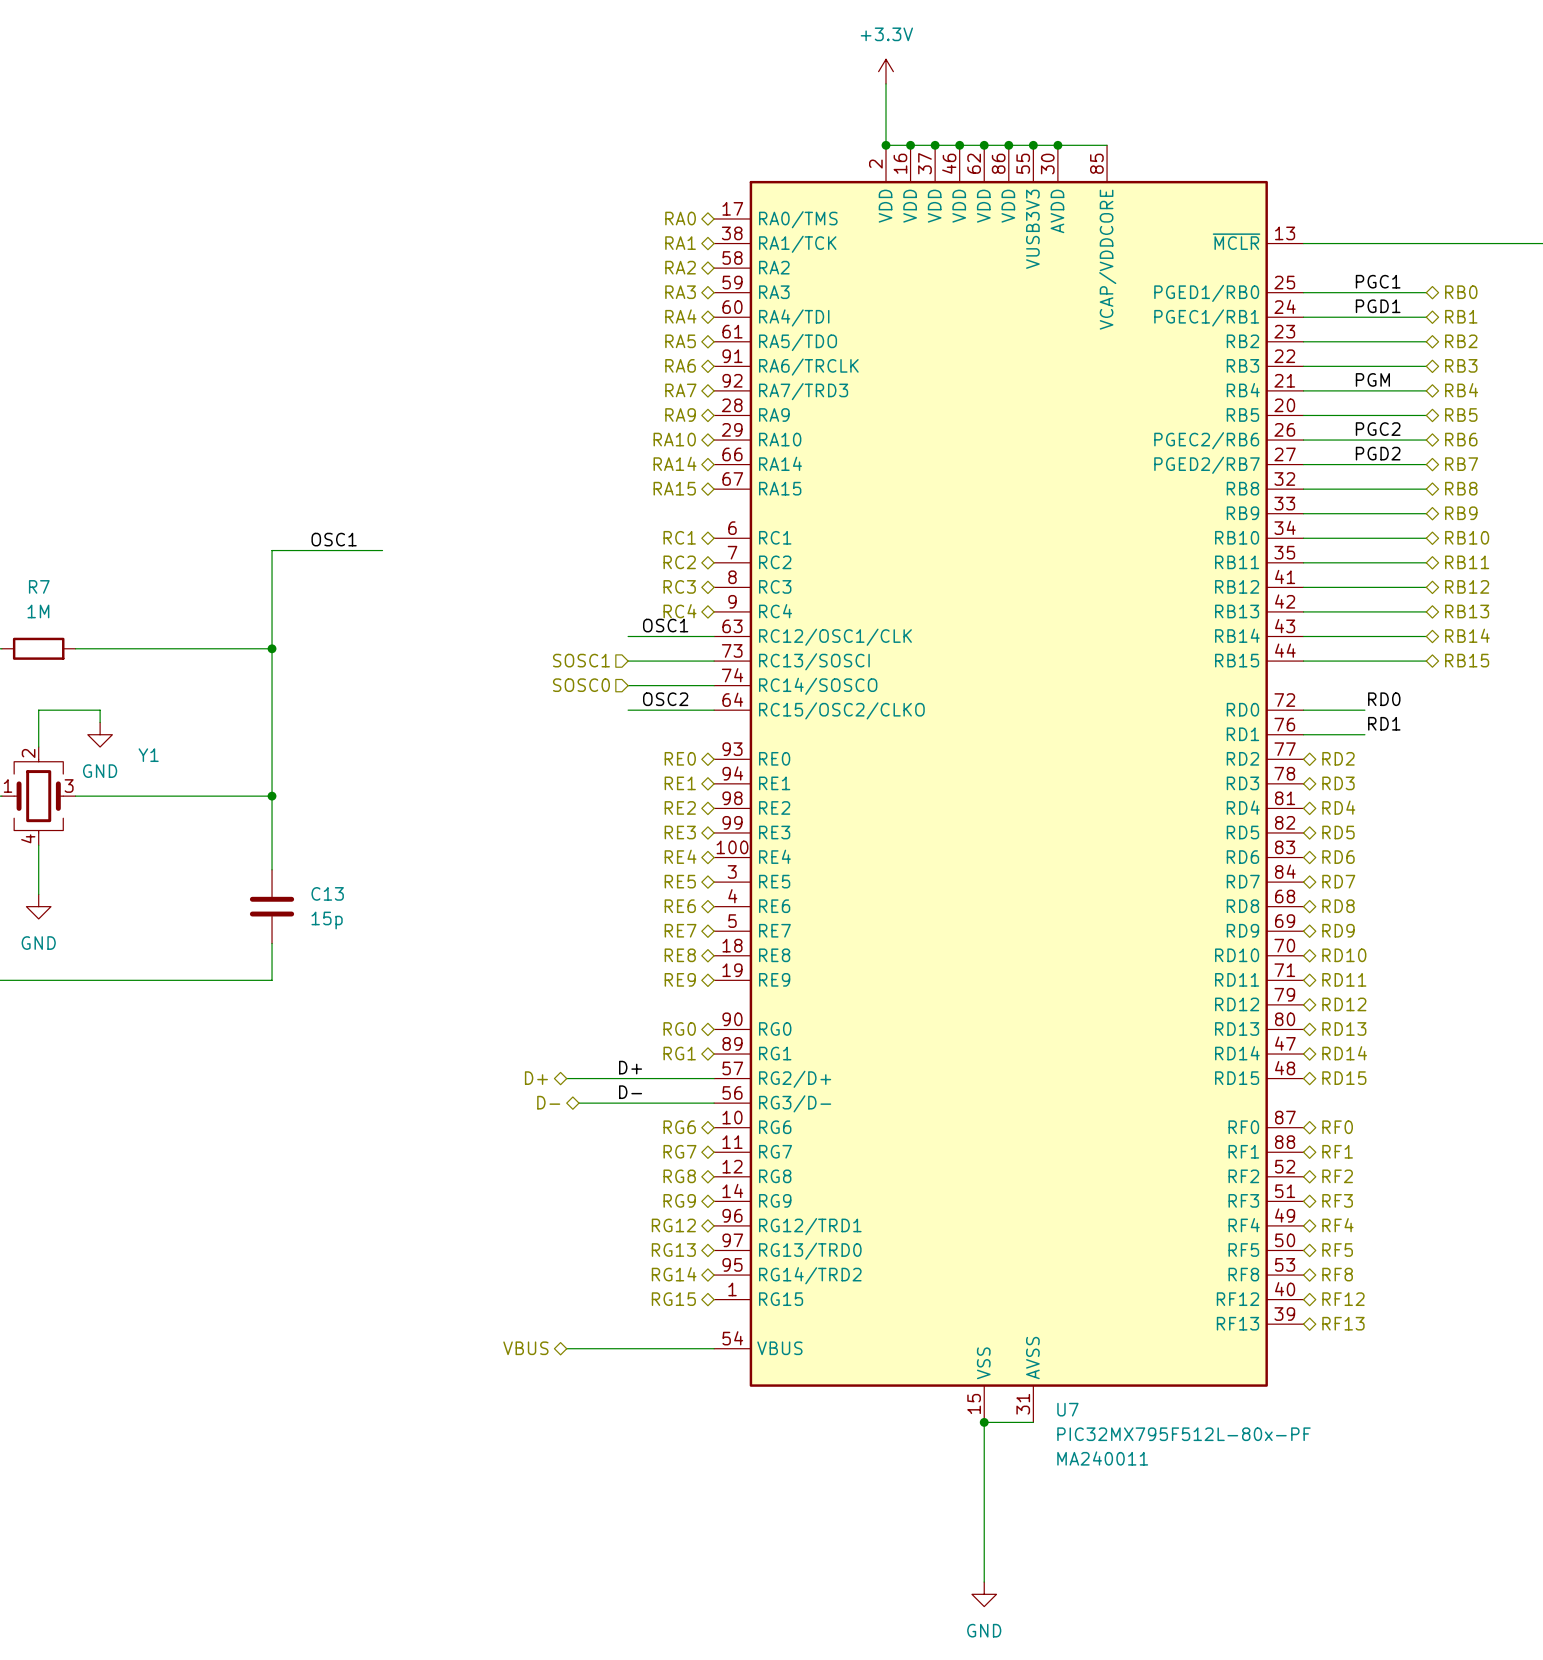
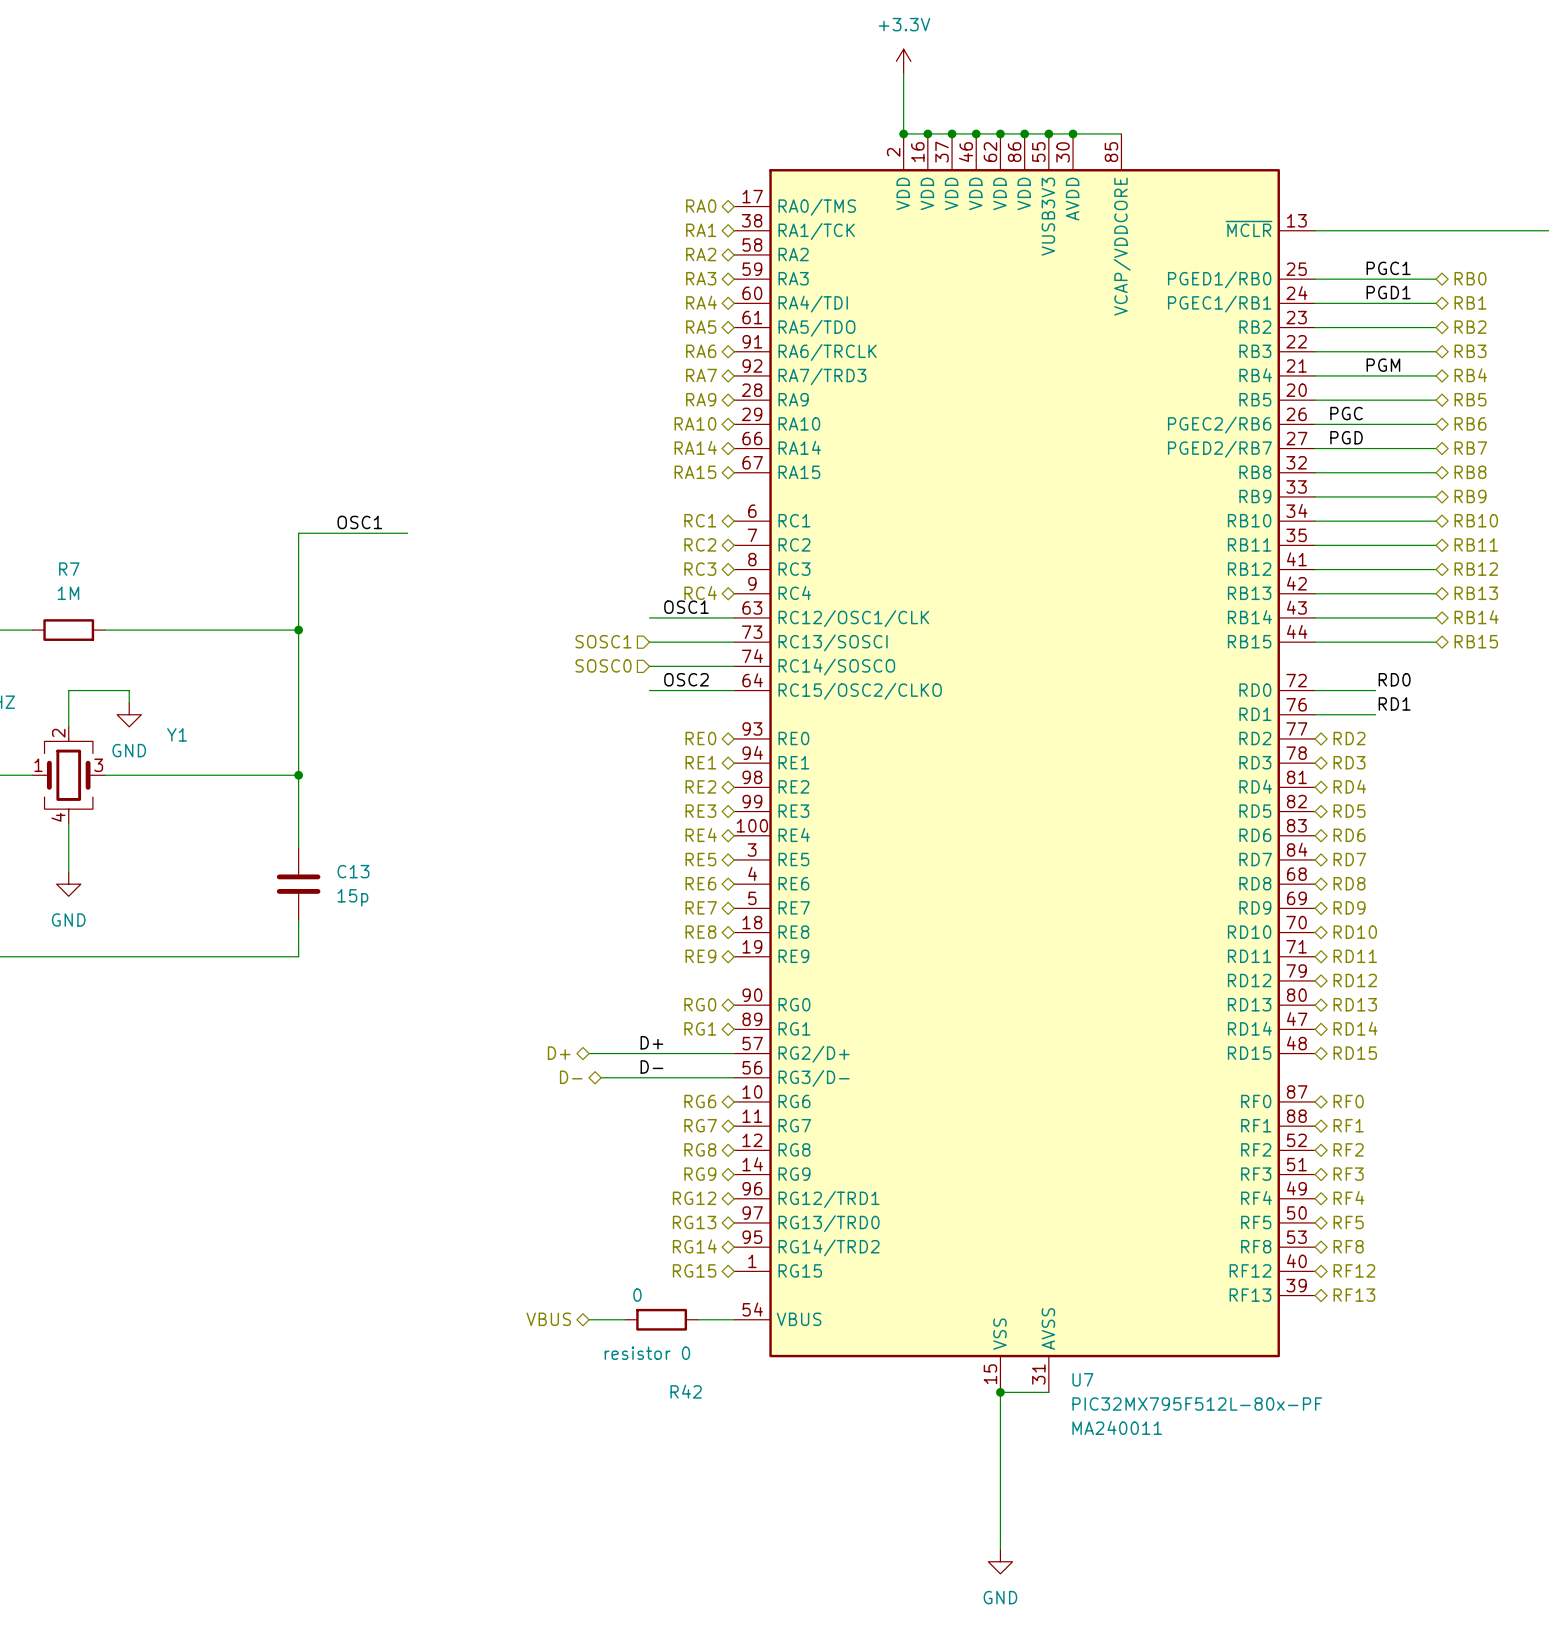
label: PGC2 (1378, 429) -> PGC (1346, 413)
label: PGD2 (1378, 453) -> PGD (1346, 437)
wire: (603, 1348) (677, 1348) -> none
R42: none -> 0 (661, 1319)

